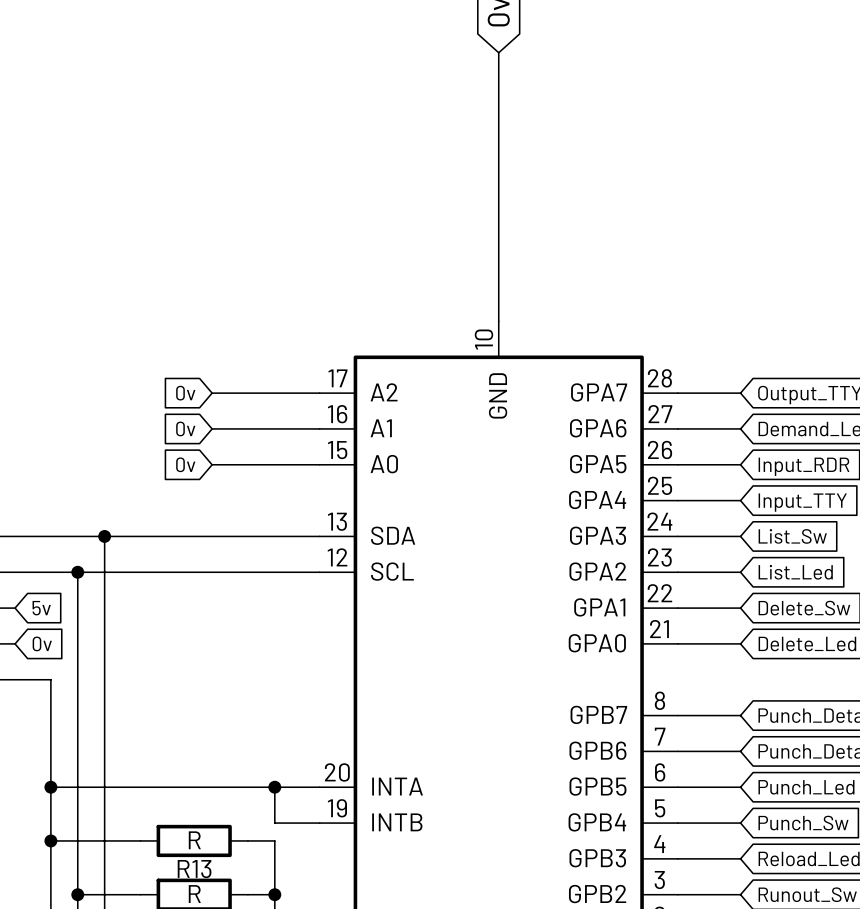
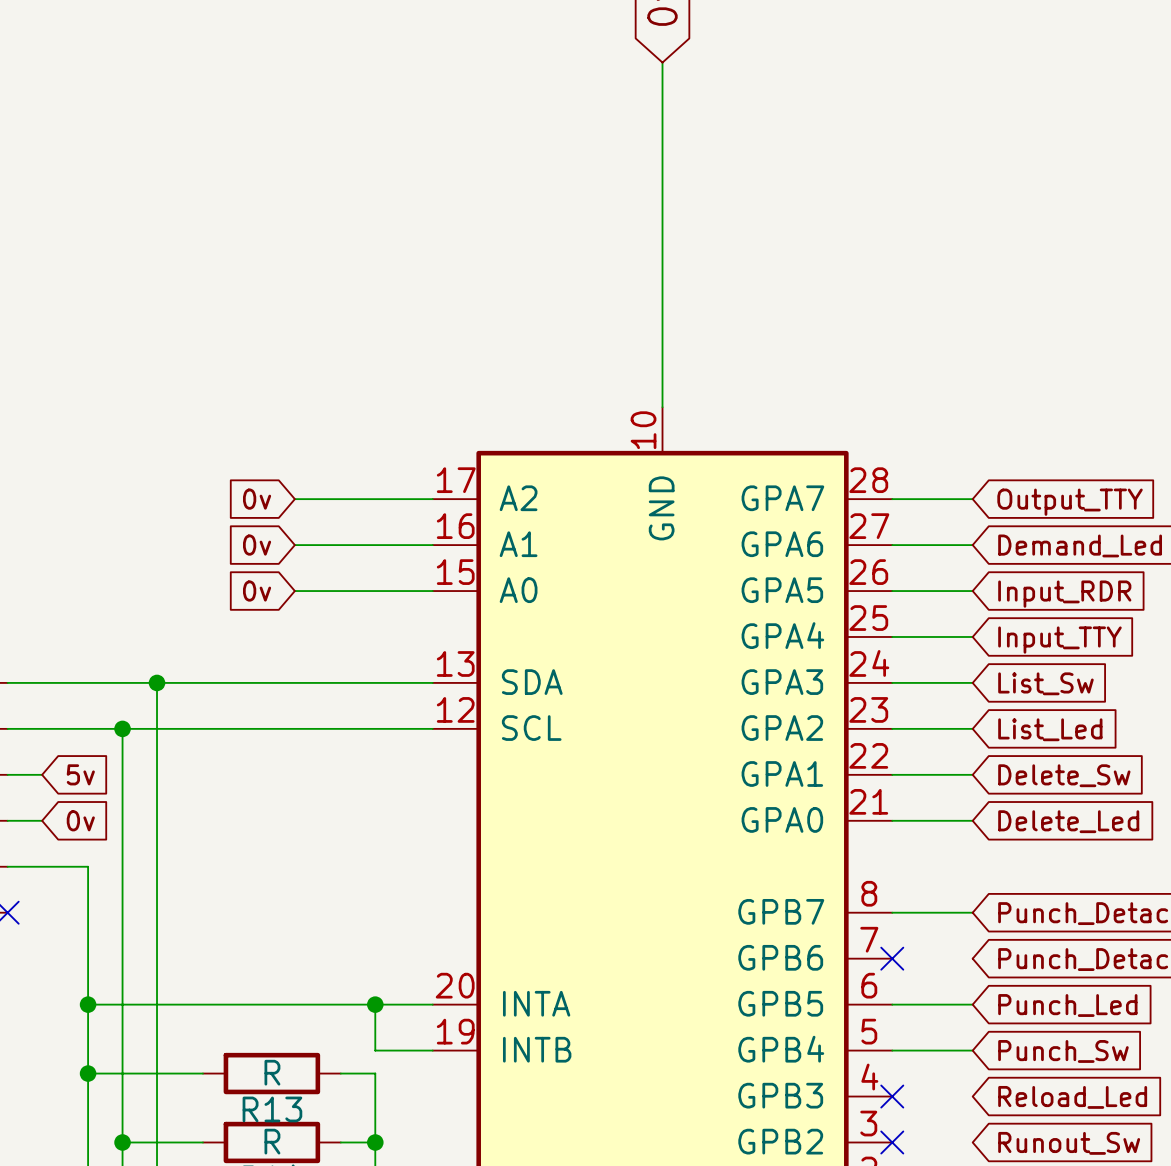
wire: (677, 751) (740, 751) -> none
no-connect mark: none -> (892, 958)
wire: (677, 858) (740, 858) -> none
no-connect mark: none -> (892, 1096)
wire: (677, 894) (740, 894) -> none
no-connect mark: none -> (892, 1142)

